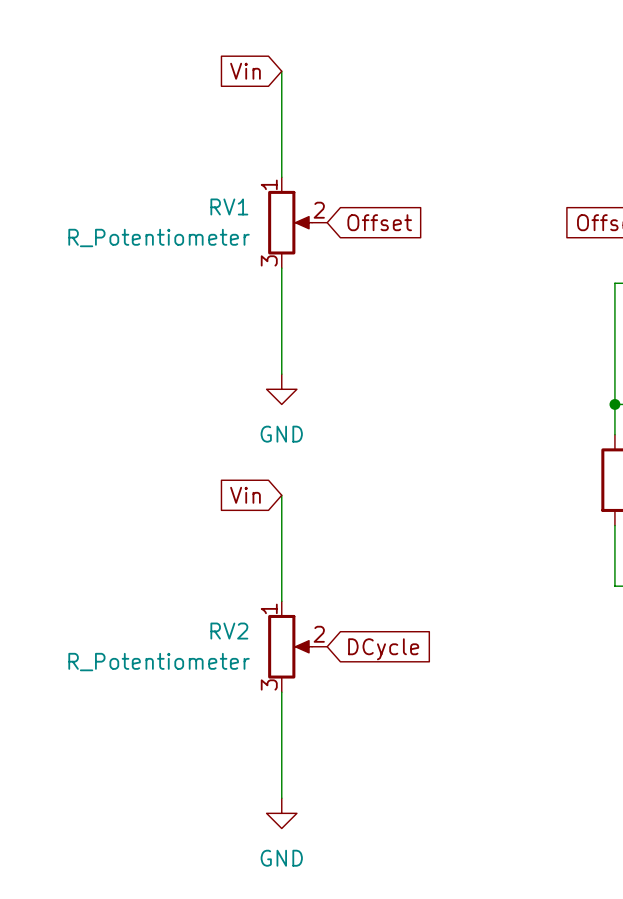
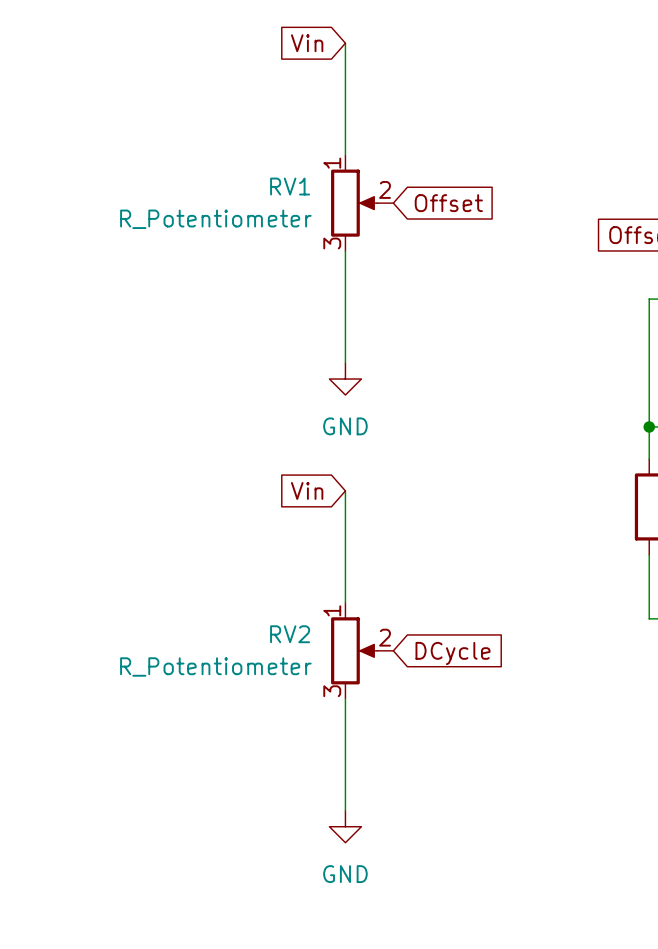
global label position: Vin (245, 71) -> Vin (307, 43)
wire: (281, 71) (281, 177) -> (345, 43) (345, 155)
RV1 position: (297, 222) -> (362, 203)
global label position: Offset (379, 222) -> Offset (448, 203)
wire: (281, 268) (281, 374) -> (345, 251) (345, 363)
power symbol position: GND (281, 389) -> GND (345, 379)
global label position: Vin (245, 495) -> Vin (307, 490)
wire: (281, 495) (281, 601) -> (345, 490) (345, 602)
RV2 position: (297, 646) -> (362, 650)
global label position: DCycle (383, 649) -> DCycle (453, 653)
wire: (281, 692) (281, 798) -> (345, 698) (345, 810)
power symbol position: GND (281, 813) -> GND (345, 826)

